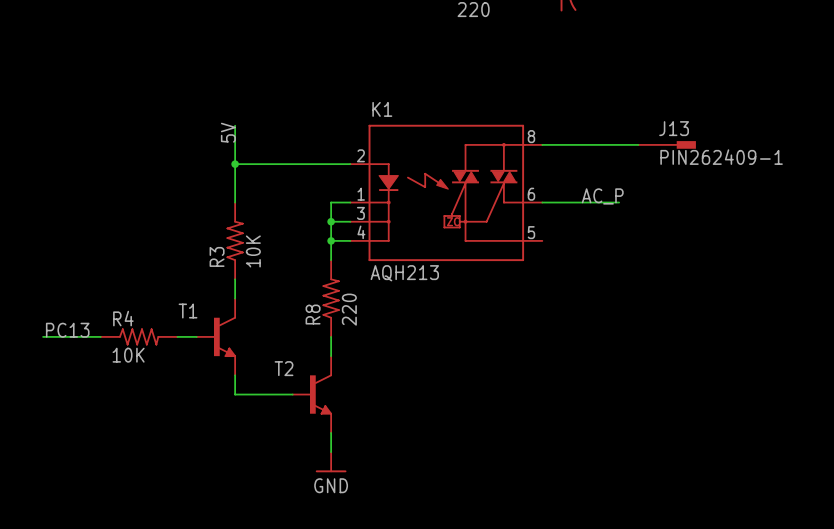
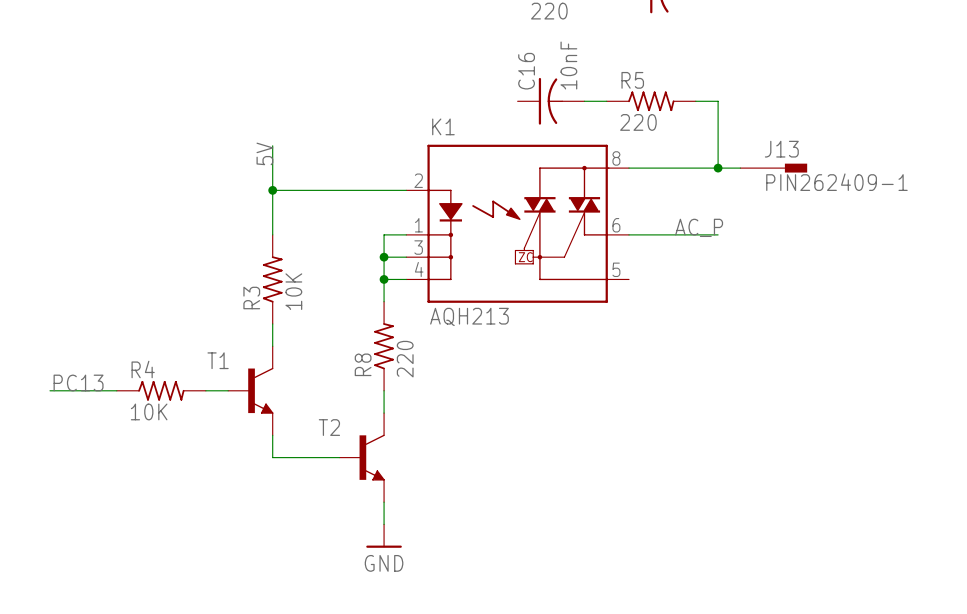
C16: none -> 10nF (551, 101)
wire: none -> (584, 101) (606, 101)
R5: none -> 220 (651, 101)
wire: none -> (695, 101) (718, 101) (718, 168)
junction: none -> (718, 168)

